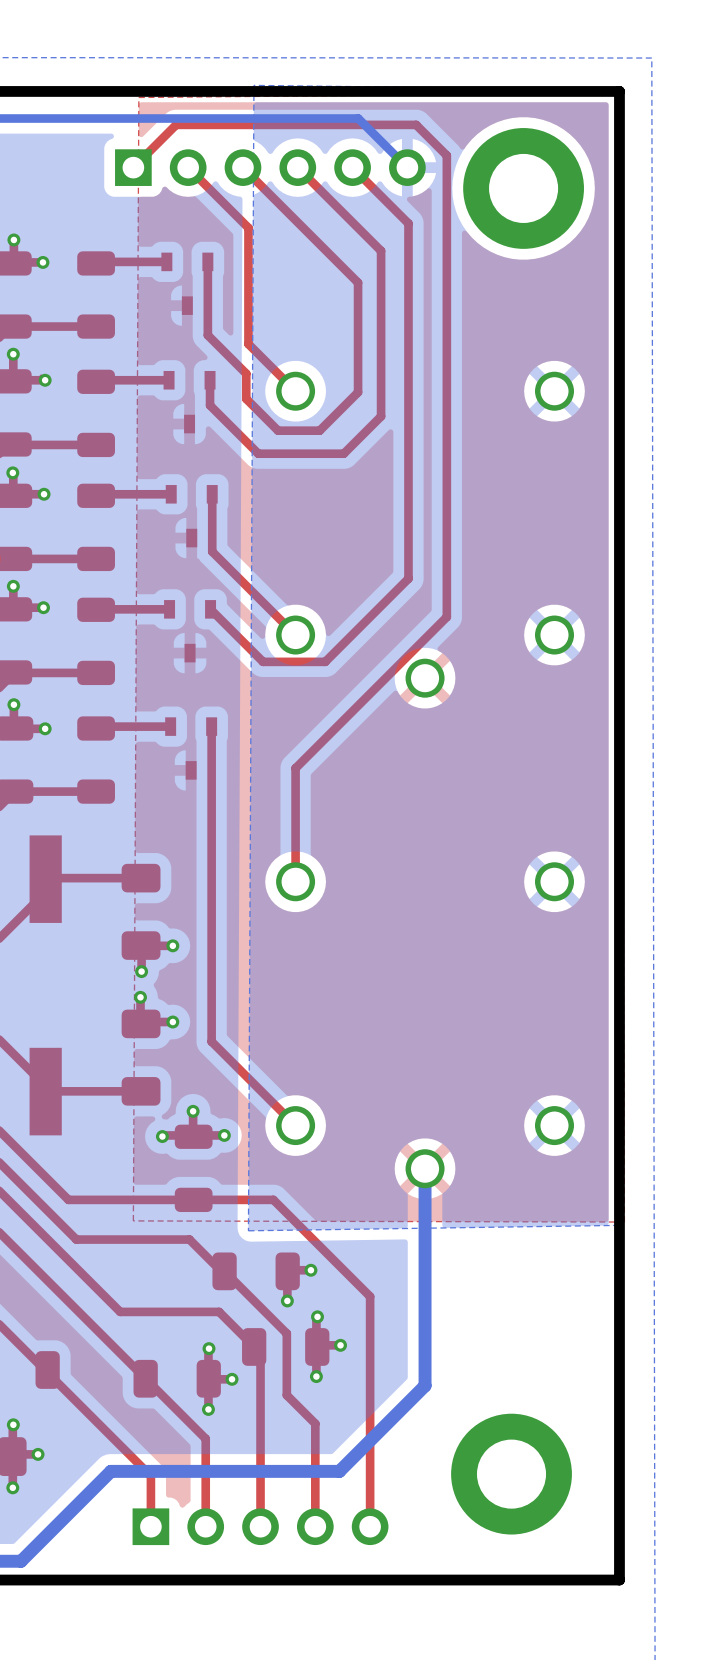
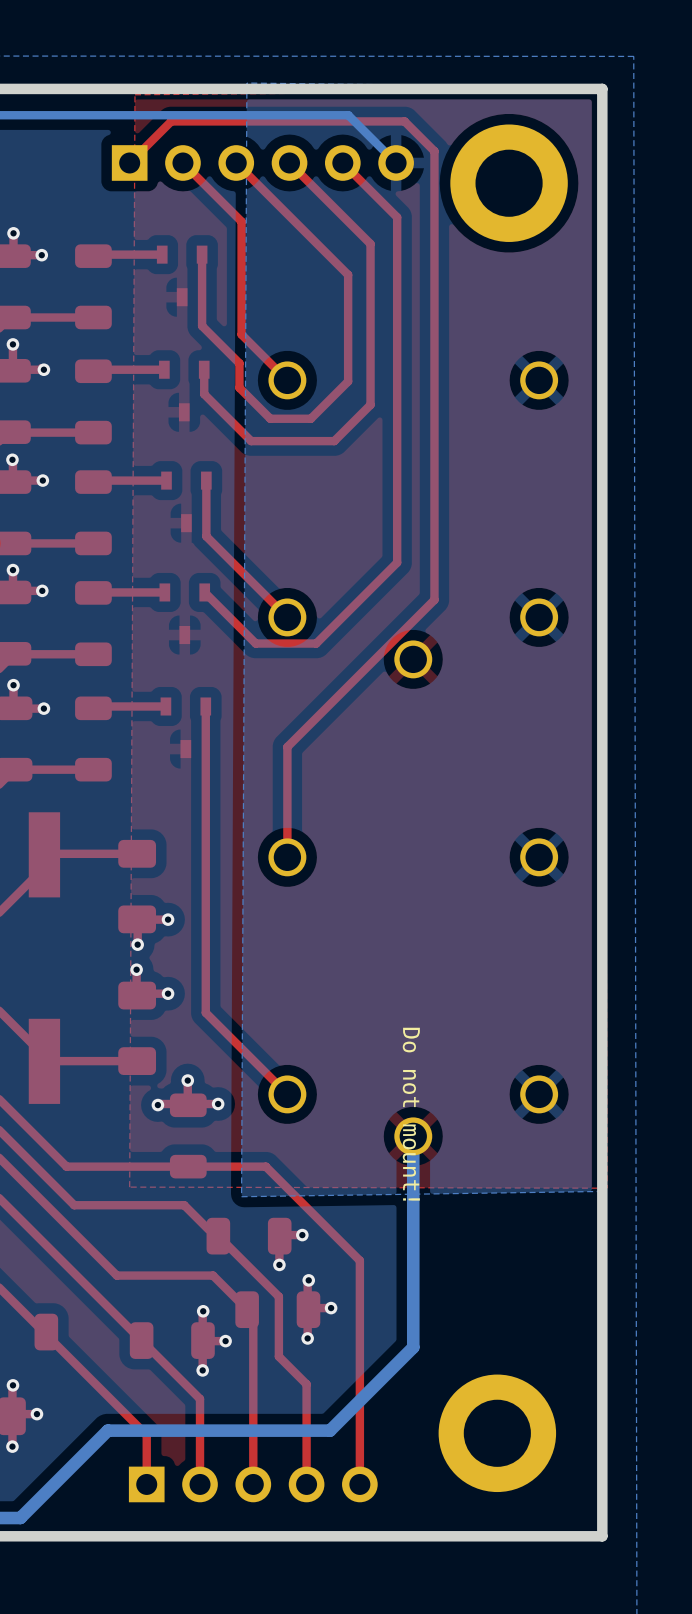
text: none -> Do not mount! (411, 1114)

